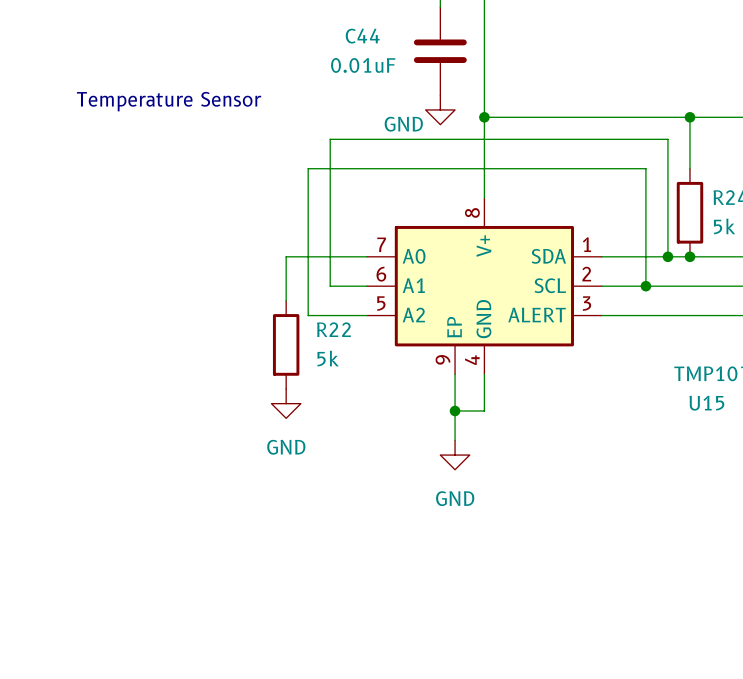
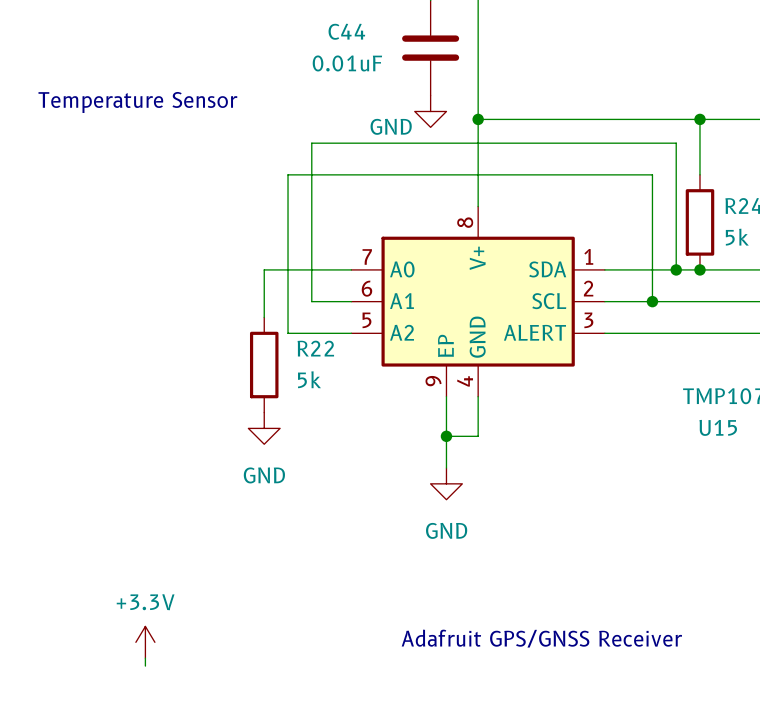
text: none -> Adafruit GPS/GNSS Receiver (541, 638)
power symbol: none -> +3.3V (145, 642)
wire: none -> (145, 658) (145, 666)

